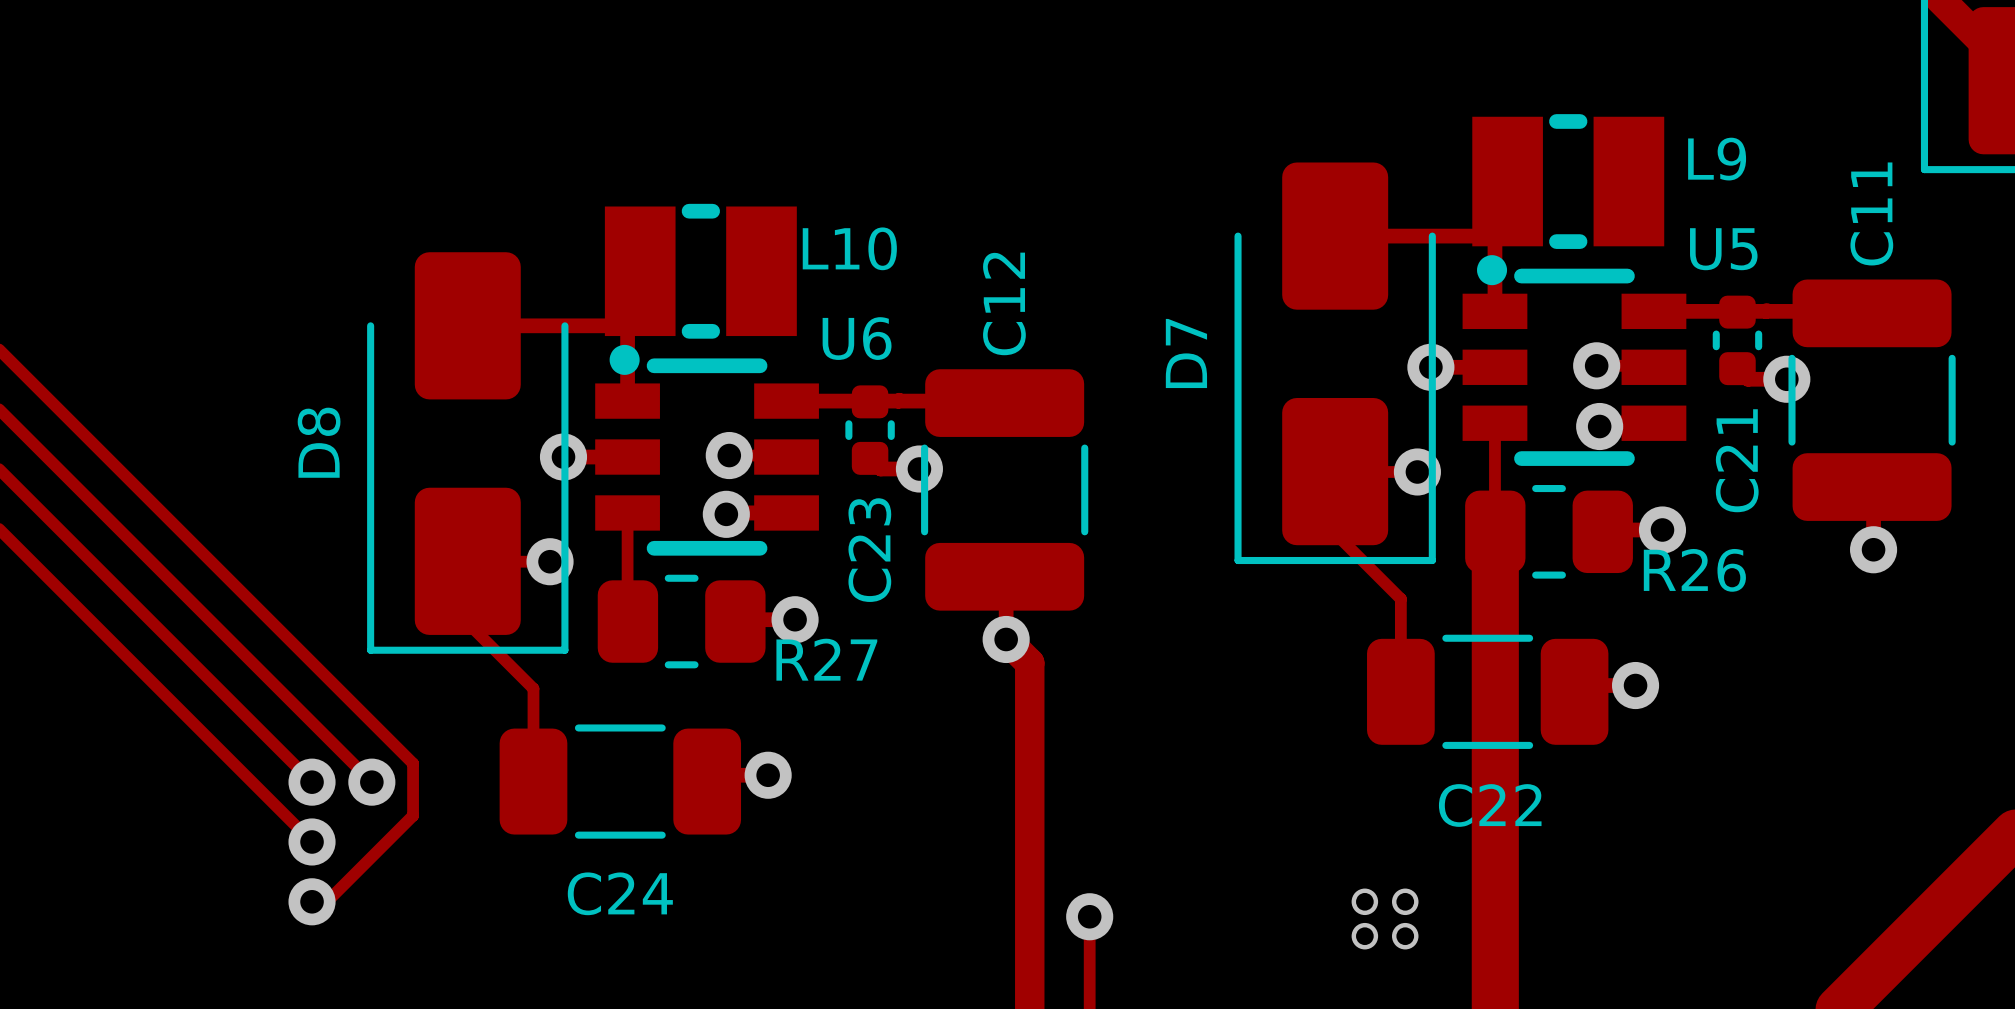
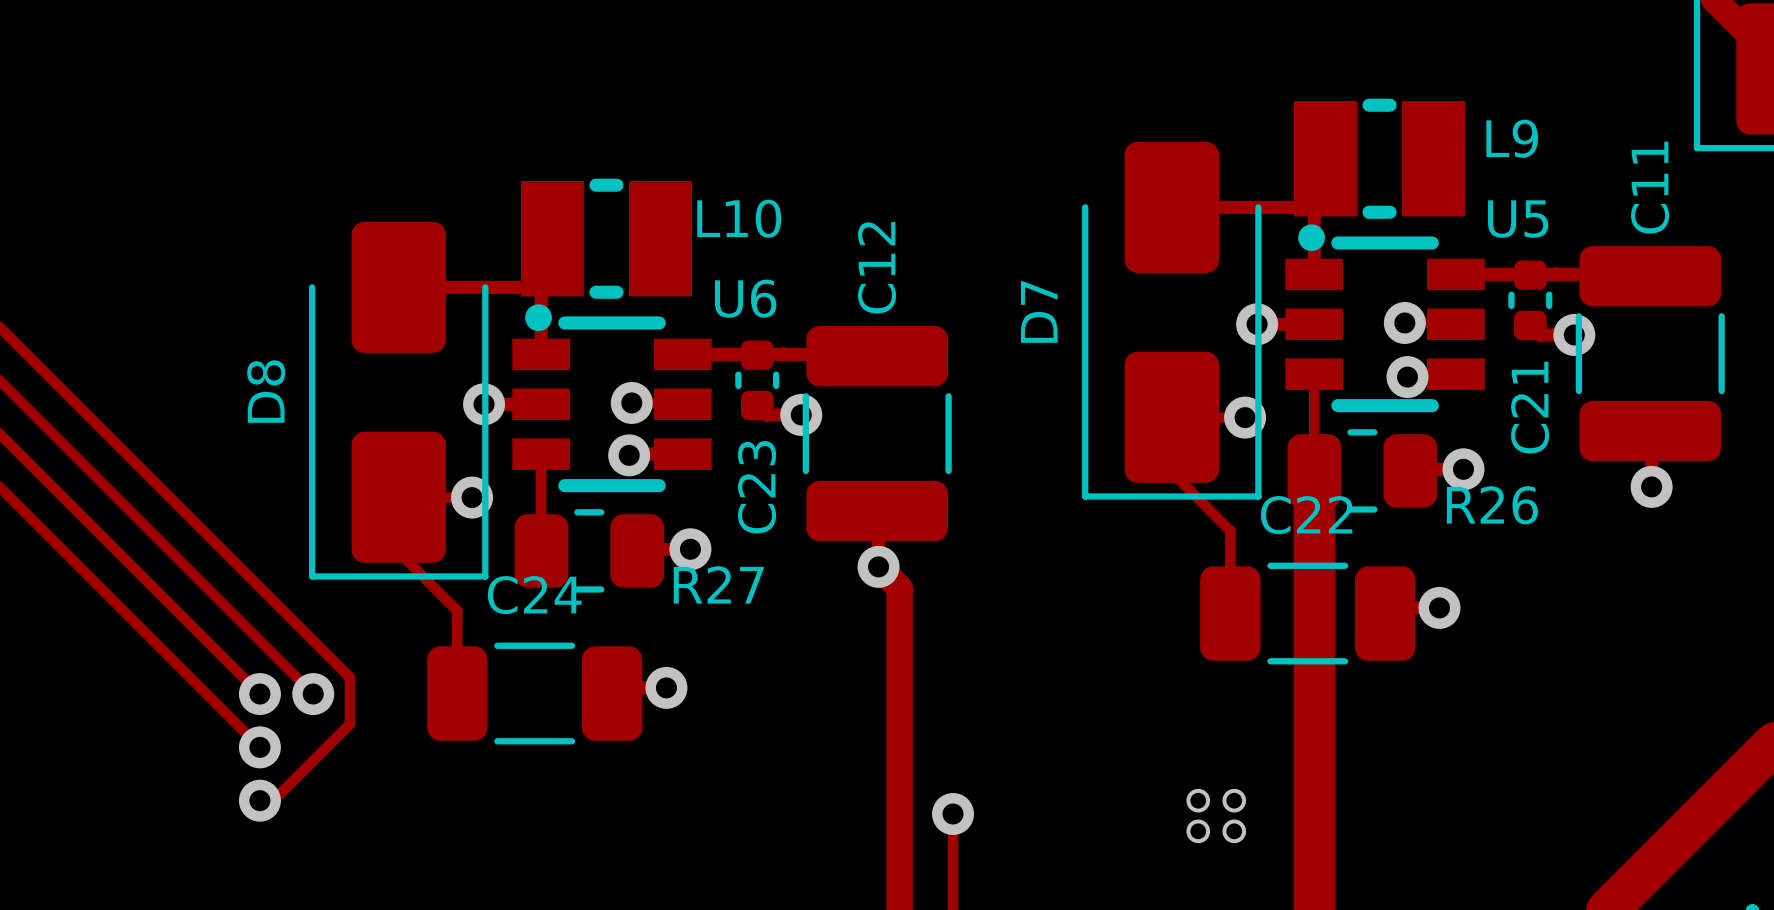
C22 name position: C22 (1490, 805) -> C22 (1306, 515)
C24 name position: C24 (620, 893) -> C24 (534, 595)

